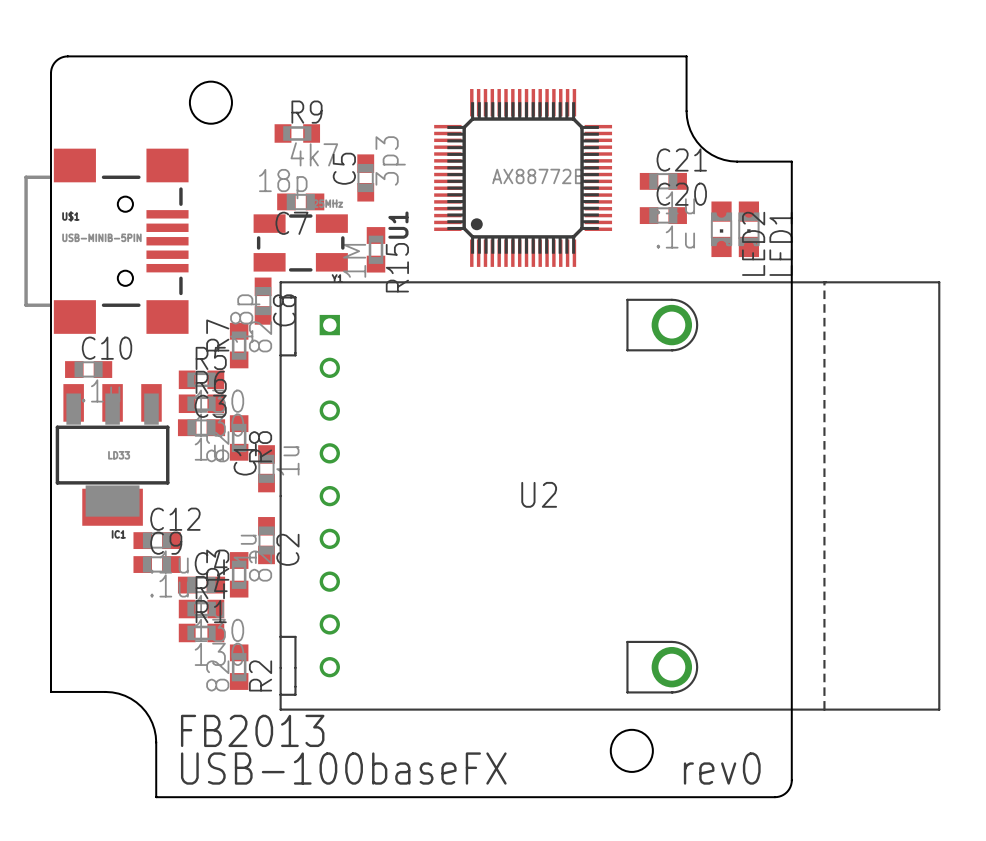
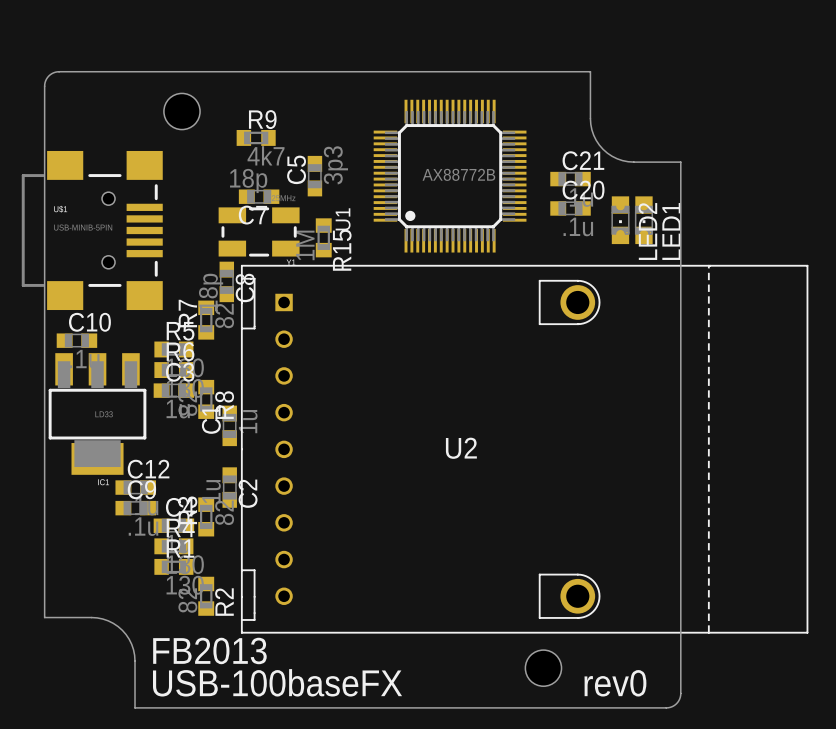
U1 footprint: [434, 89, 613, 267] -> [373, 99, 527, 253]

